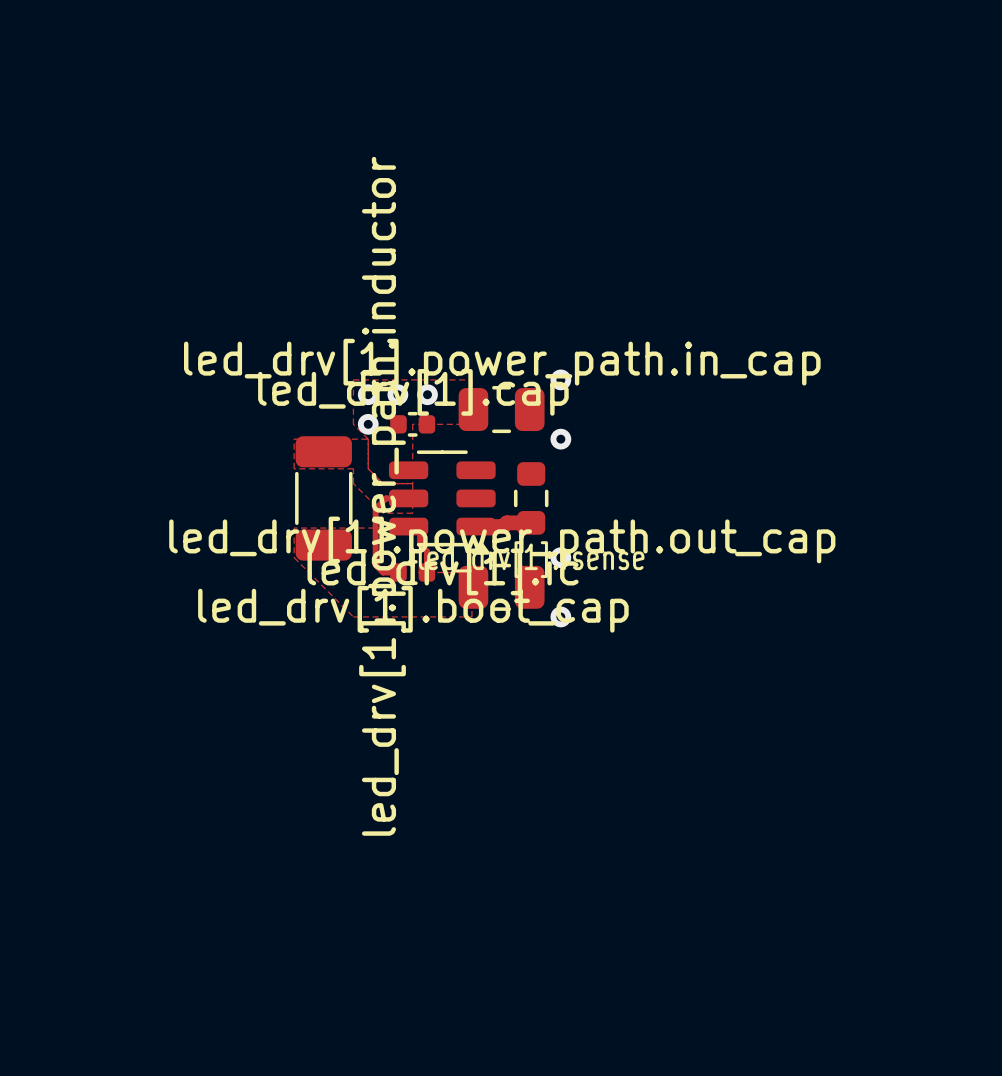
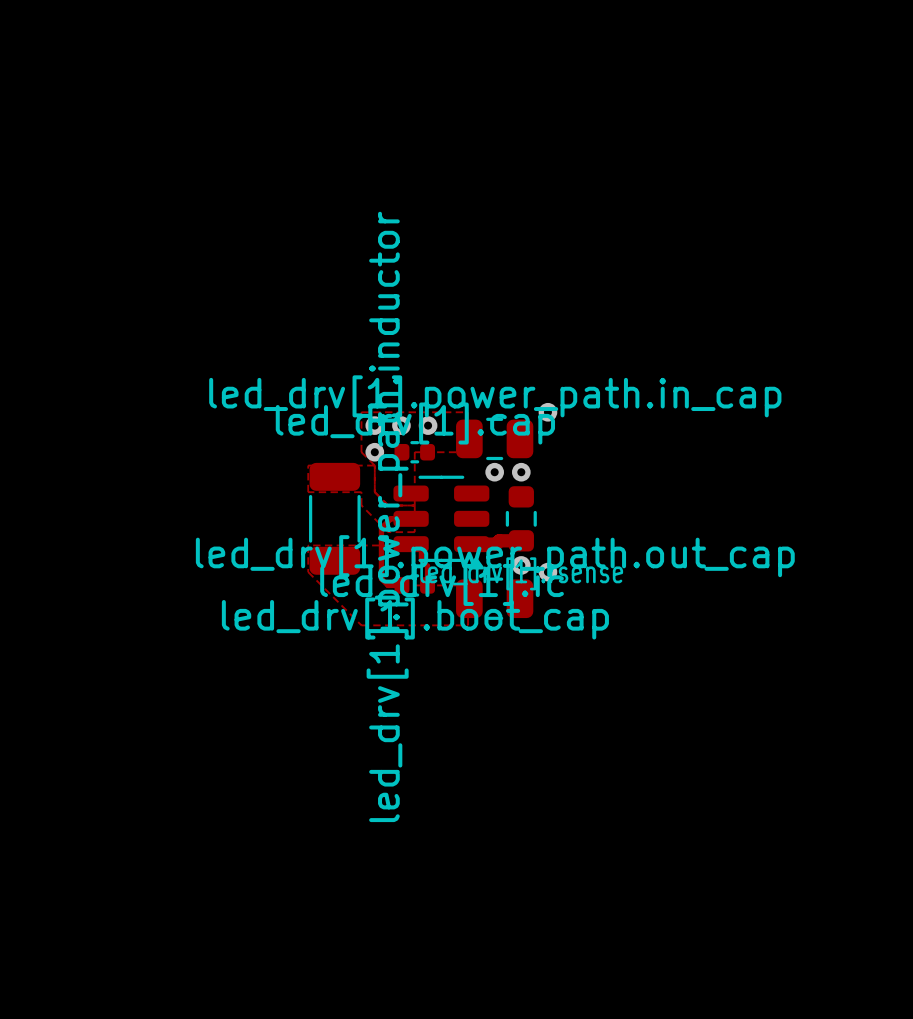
via: (560, 439) -> none
via: none -> (494, 472)
via: none -> (521, 472)
via: none -> (521, 565)
via: (560, 616) -> none

